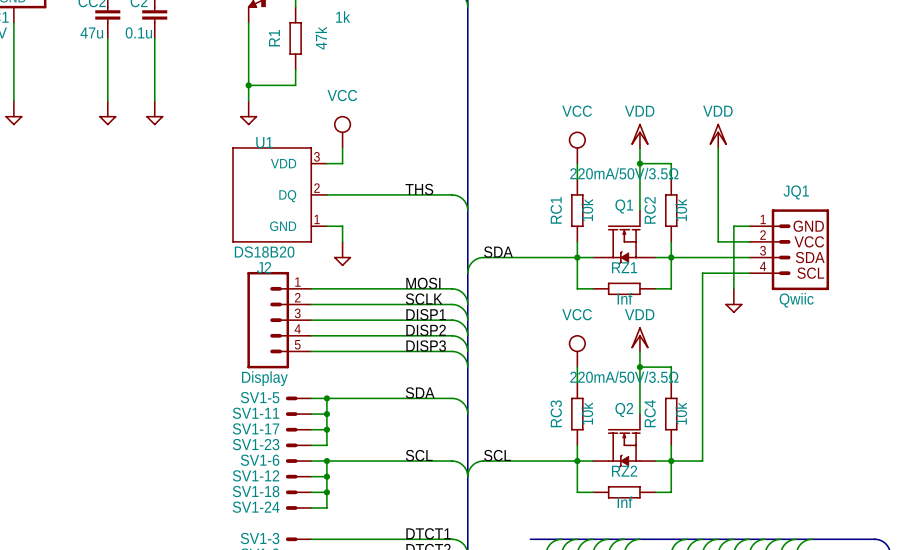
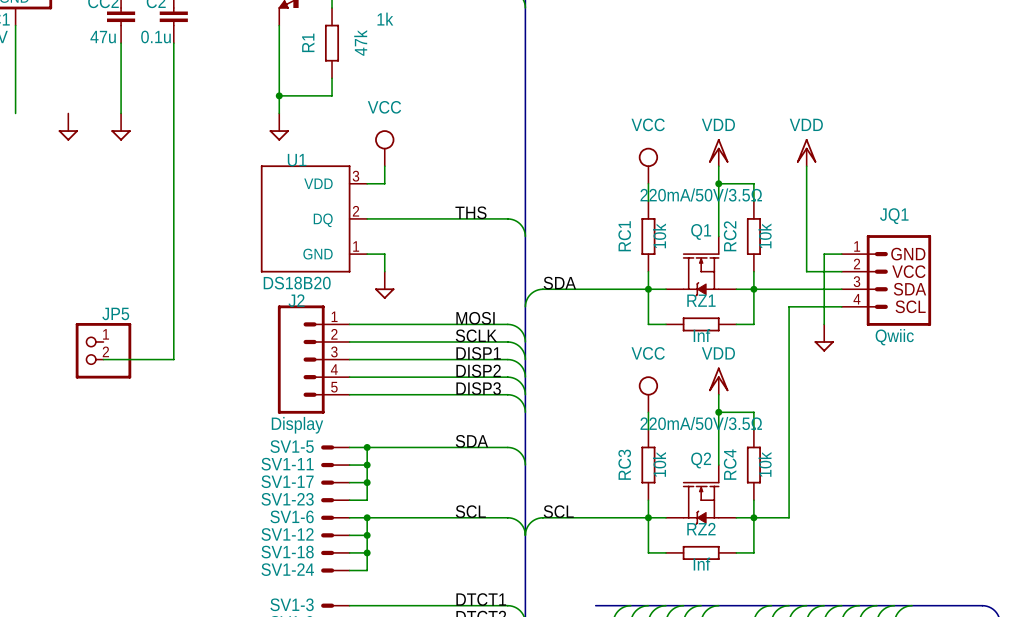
wire: none -> (173, 113) (173, 359) (103, 359)
power symbol: (13, 113) -> none
power symbol: none -> (68, 127)
power symbol: (154, 113) -> none
JP5: none -> (103, 350)

